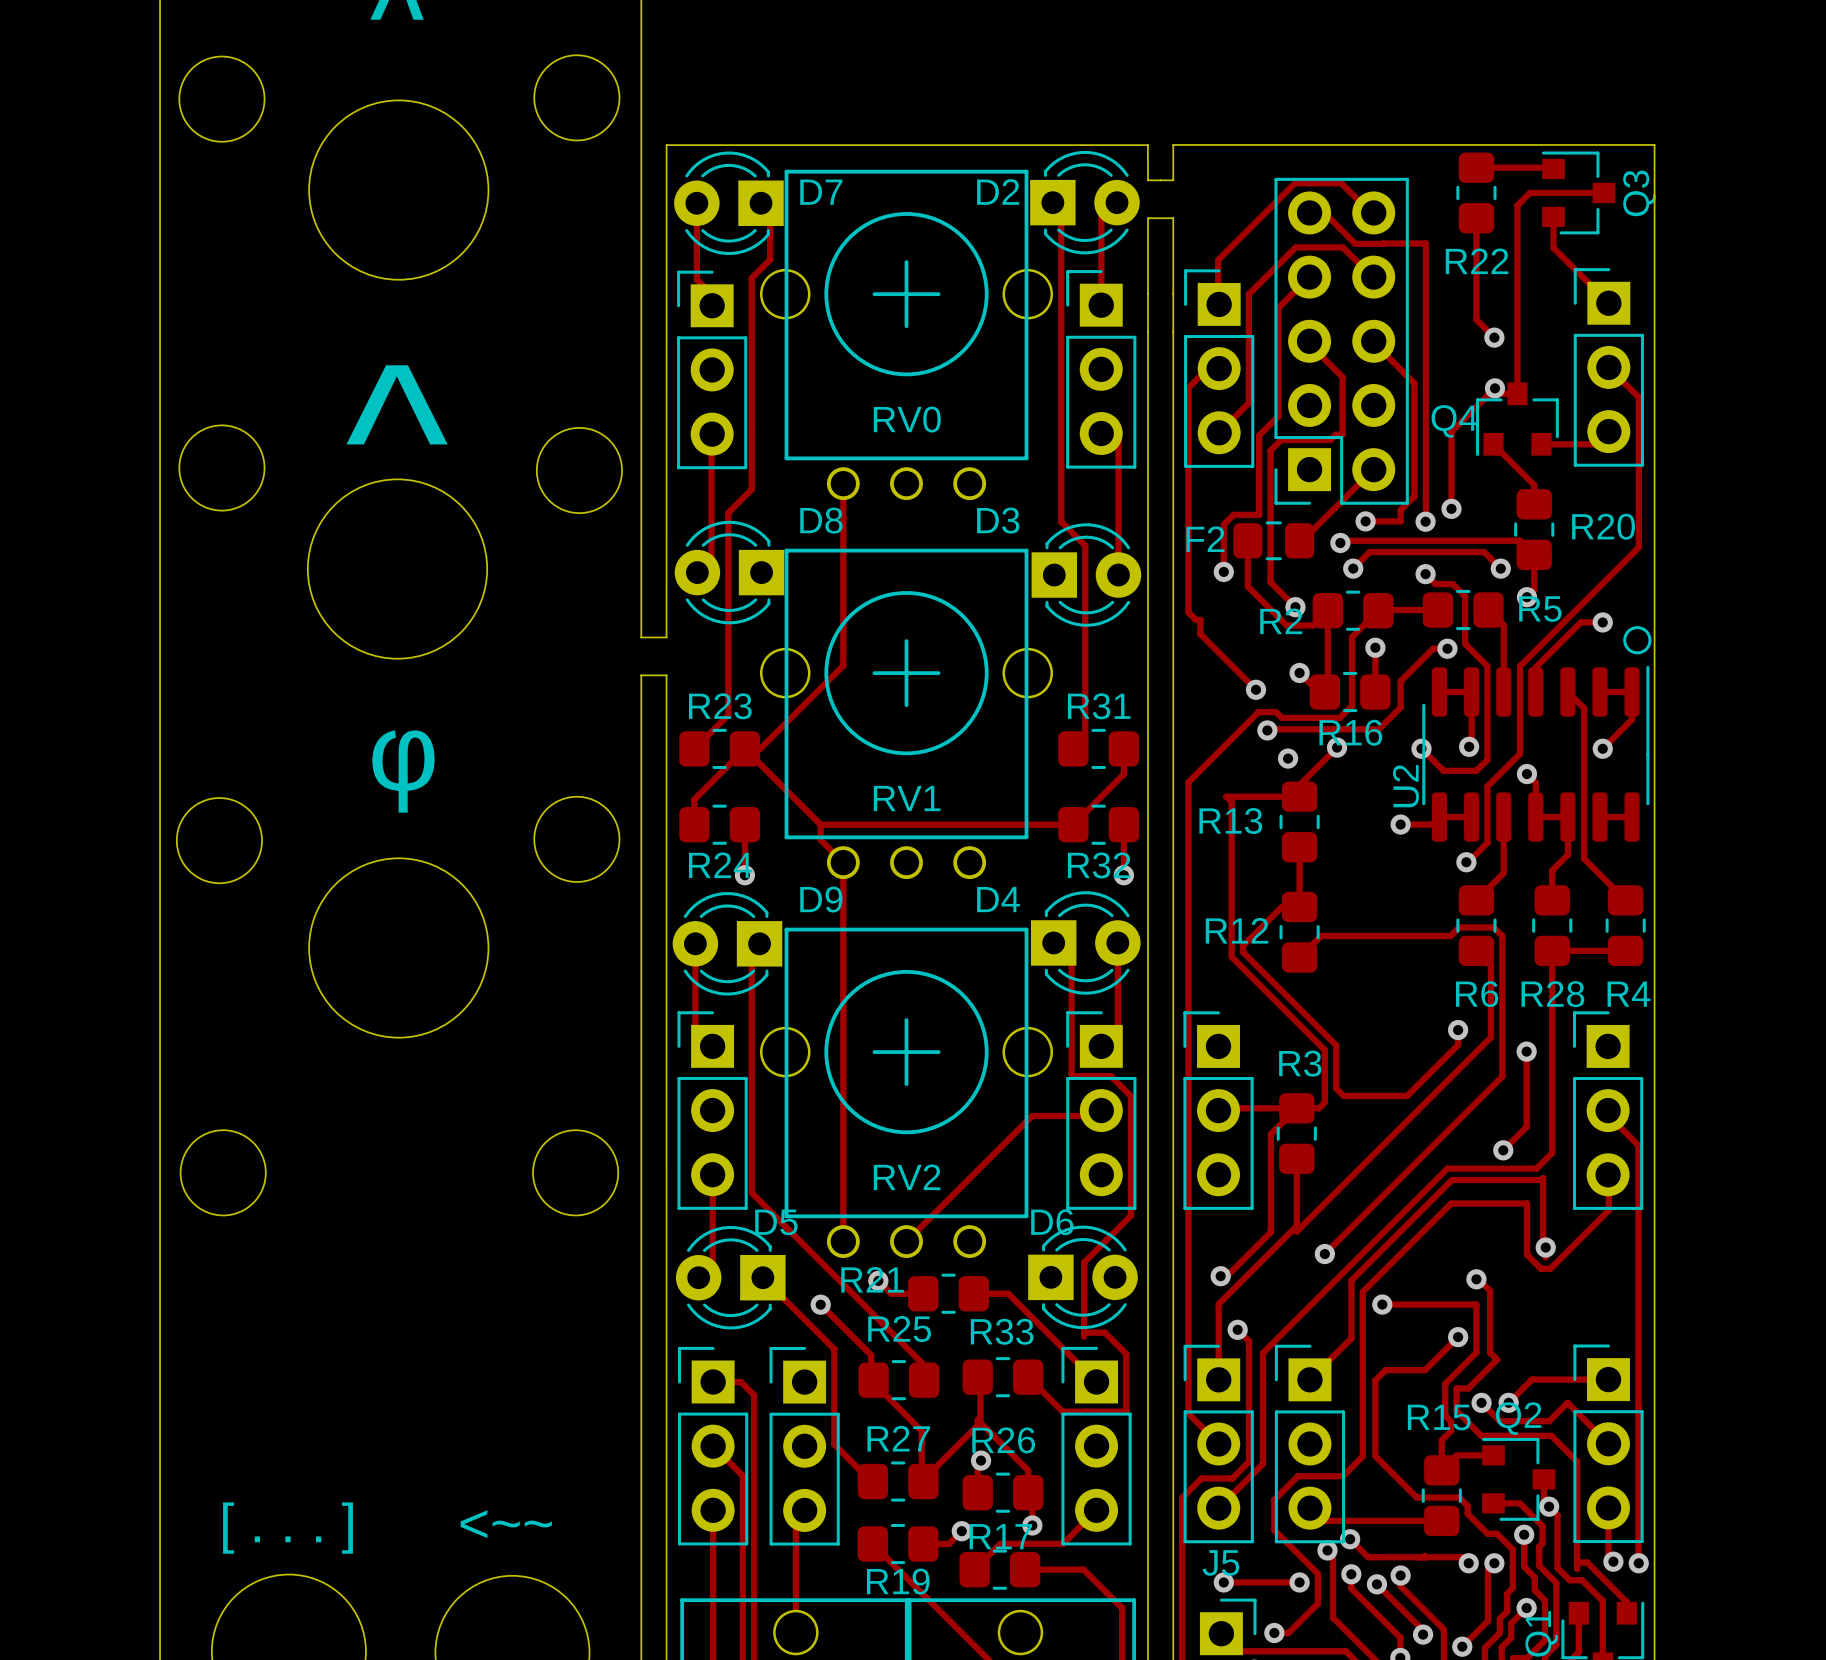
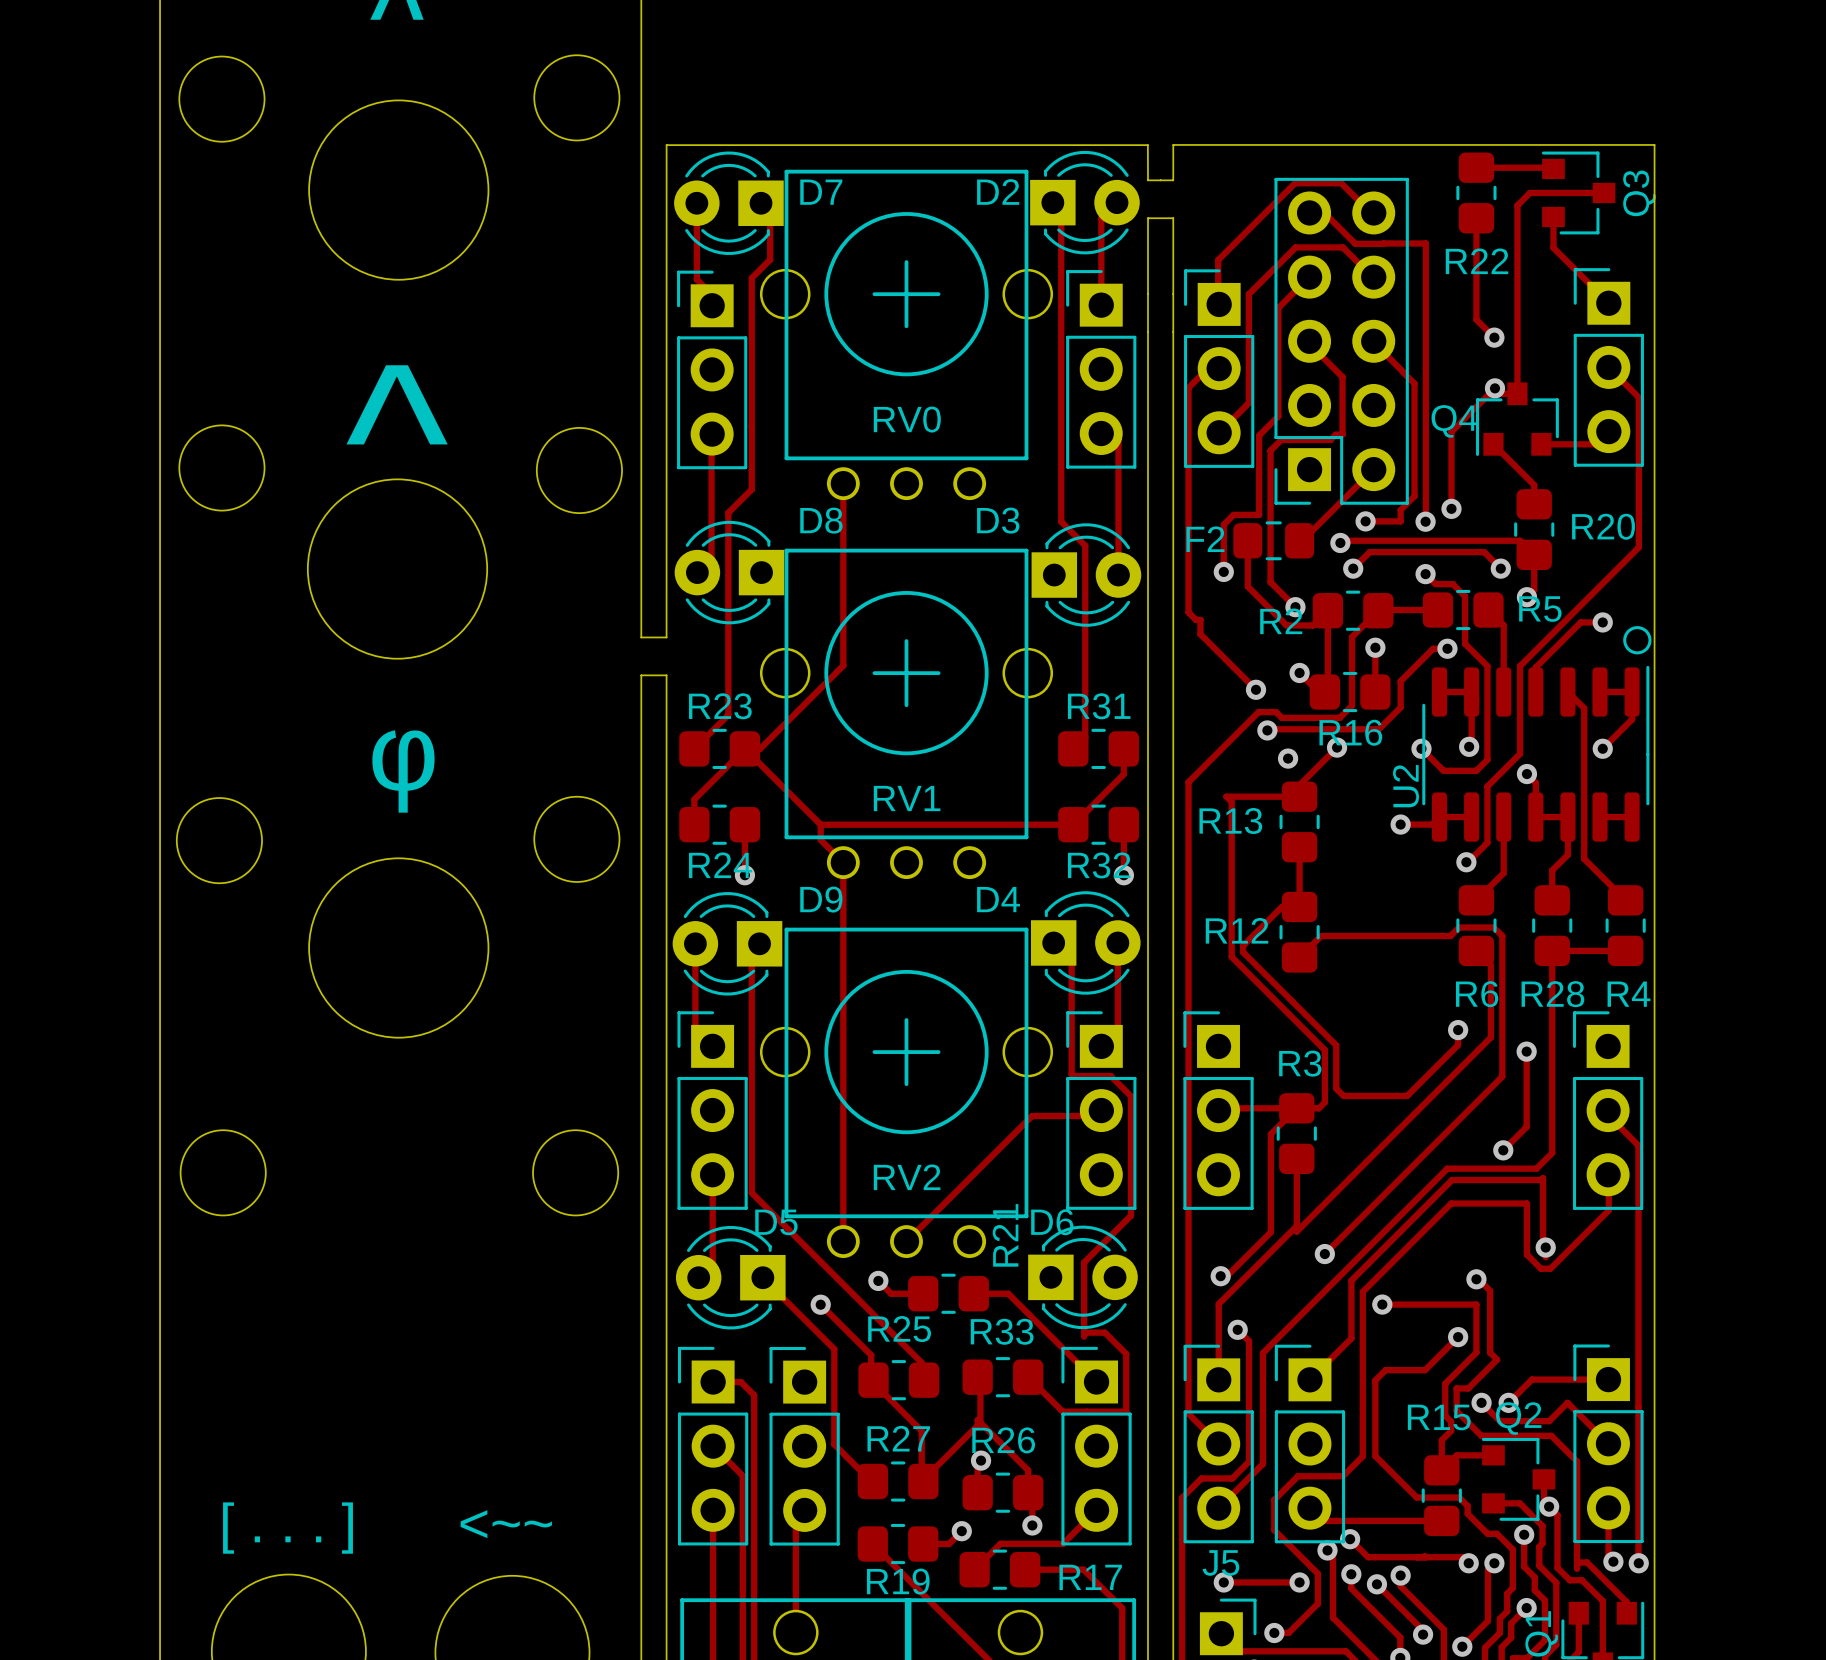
R21 name rotation: 0° (872, 1279) -> 90° counterclockwise (1005, 1235)
R21 name position: R21 (872, 1279) -> R21 (1005, 1235)
R17 name position: R17 (1000, 1536) -> R17 (1090, 1577)

